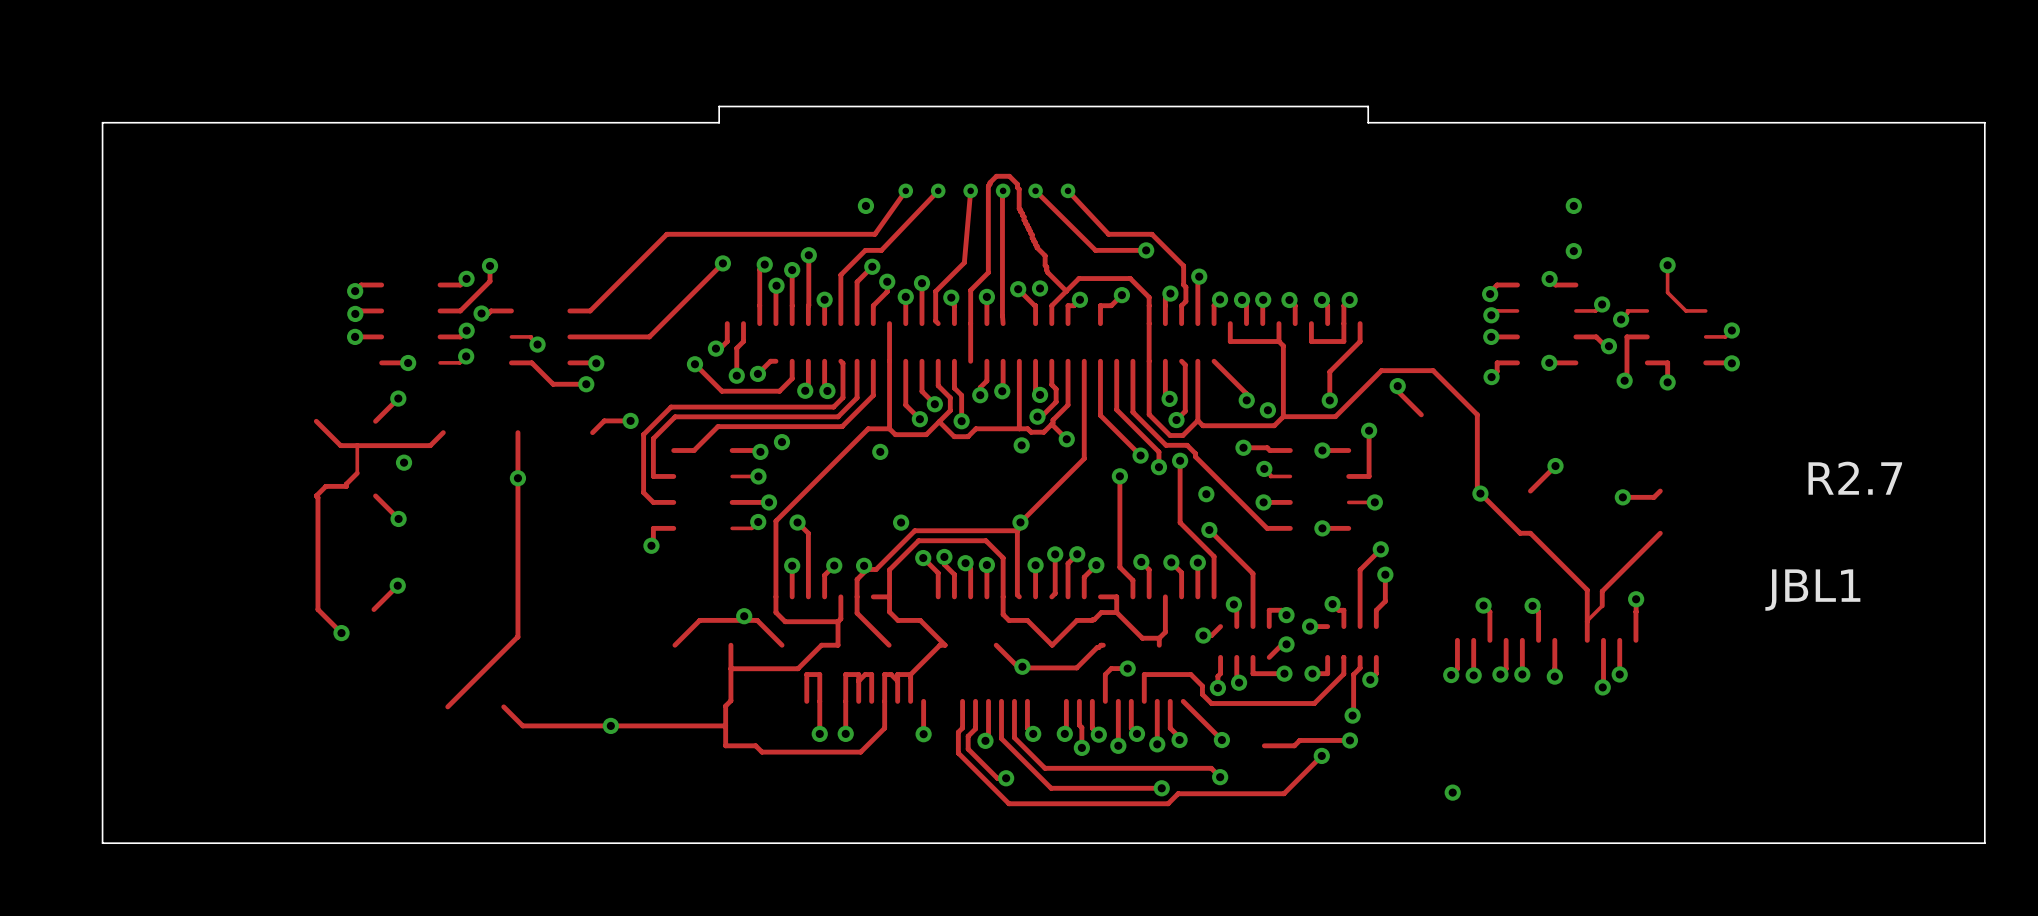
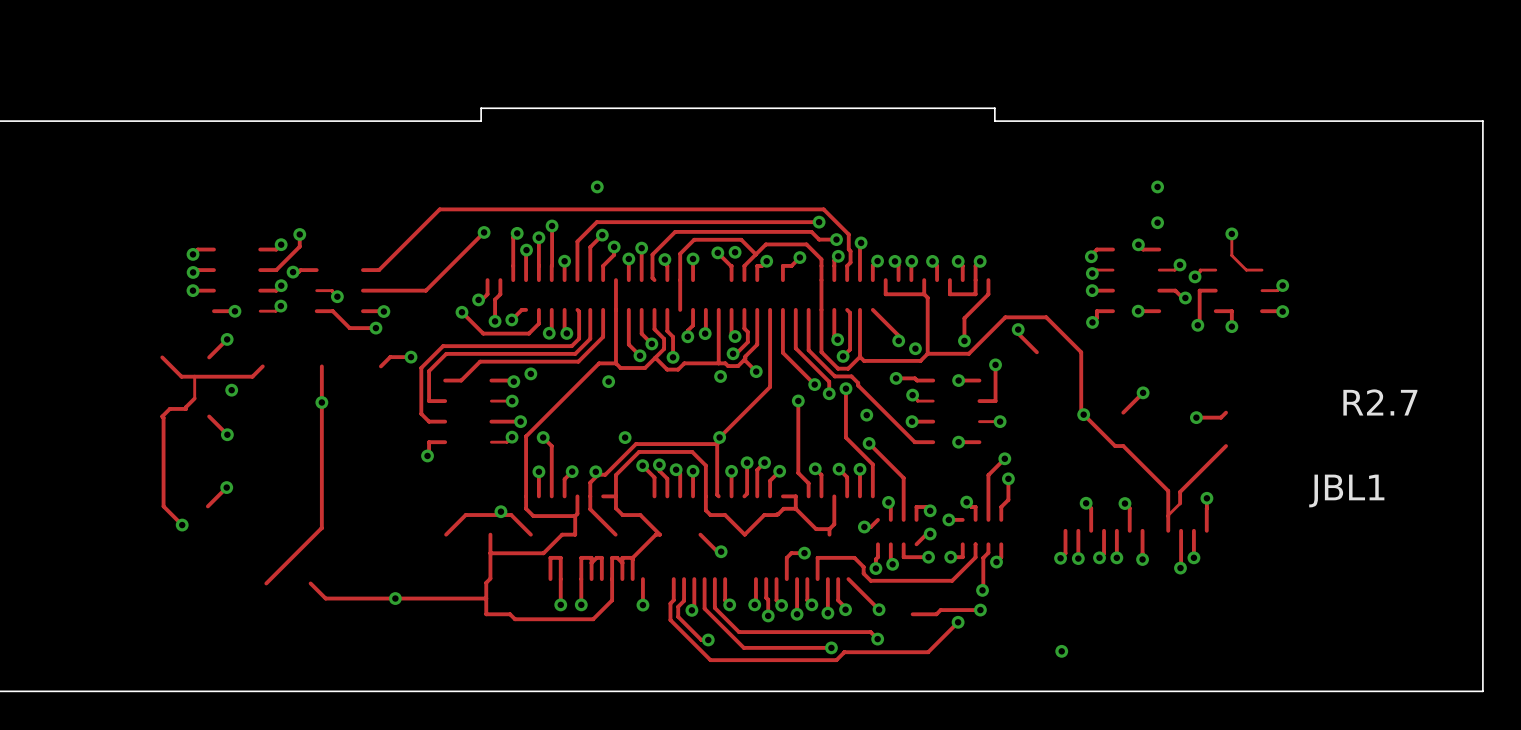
track: (905, 190) (874, 234) -> none
via: (905, 190) -> none
track: (938, 190) (881, 250) -> none
via: (938, 190) -> none
track: (970, 190) (964, 262) -> (836, 239) (819, 239) (811, 231) (675, 231)
via: (970, 190) -> none
track: (1003, 190) (1003, 323) -> none
via: (1003, 190) -> none
track: (1035, 190) (1095, 250) -> (609, 222) (779, 222)
via: (1035, 190) -> none
track: (1068, 190) (1108, 234) -> (604, 209) (789, 209)
via: (1068, 190) -> none
track: (988, 272) (988, 186) (996, 176) (1009, 176) (1017, 184) (1019, 208) (1037, 247) (1045, 255) (1045, 265) (1047, 272) -> (694, 239) (741, 239)
via: none -> (836, 239)
track: (1103, 645) (1097, 647) (1076, 667) (1022, 666) -> none

